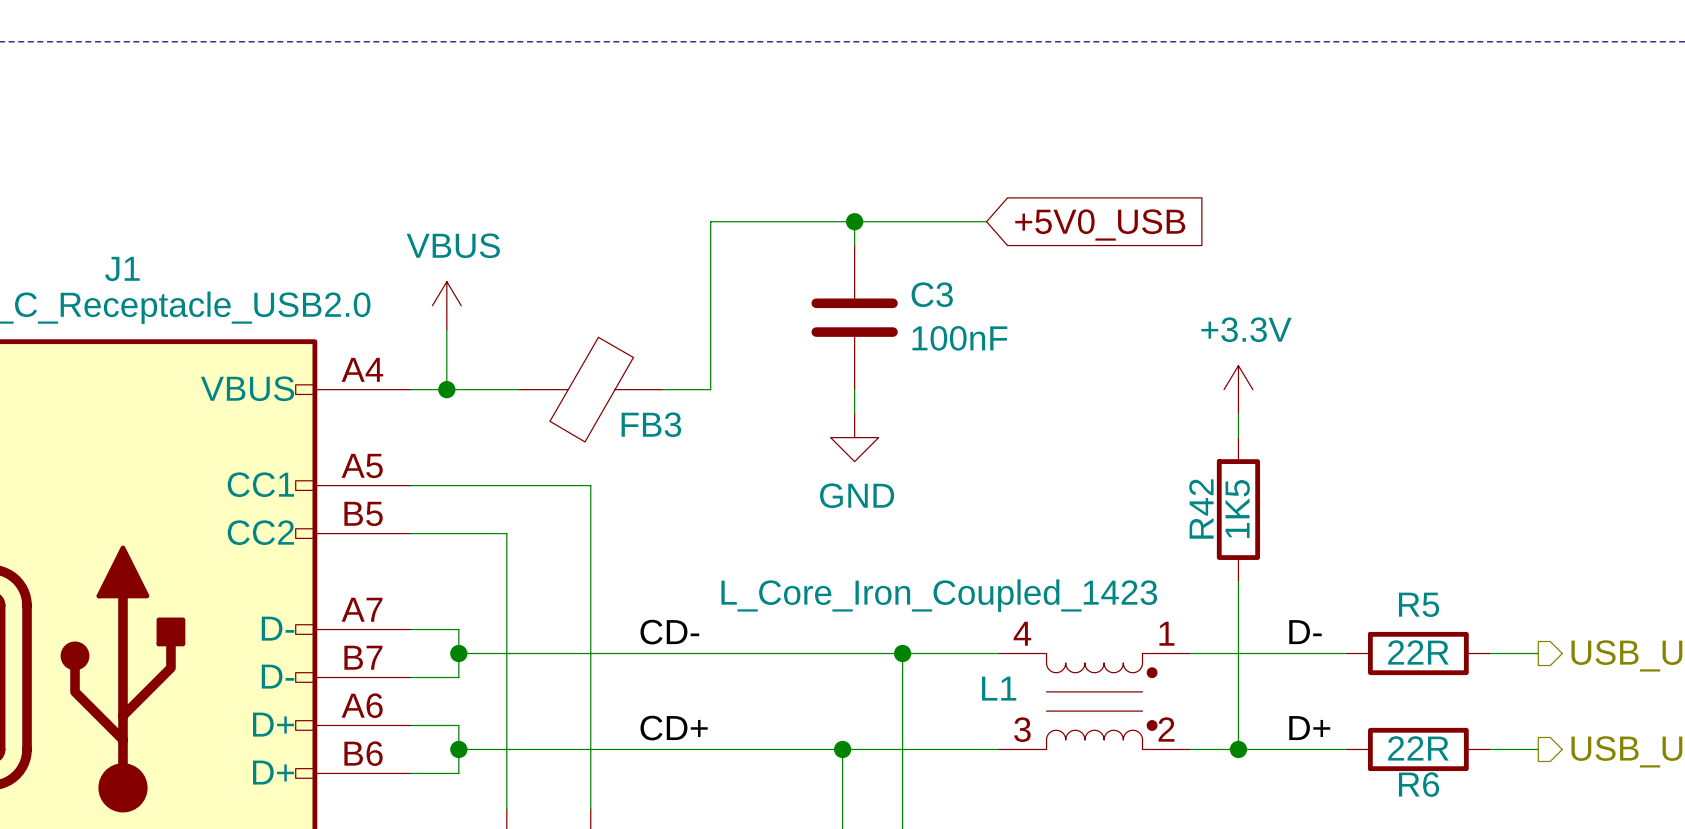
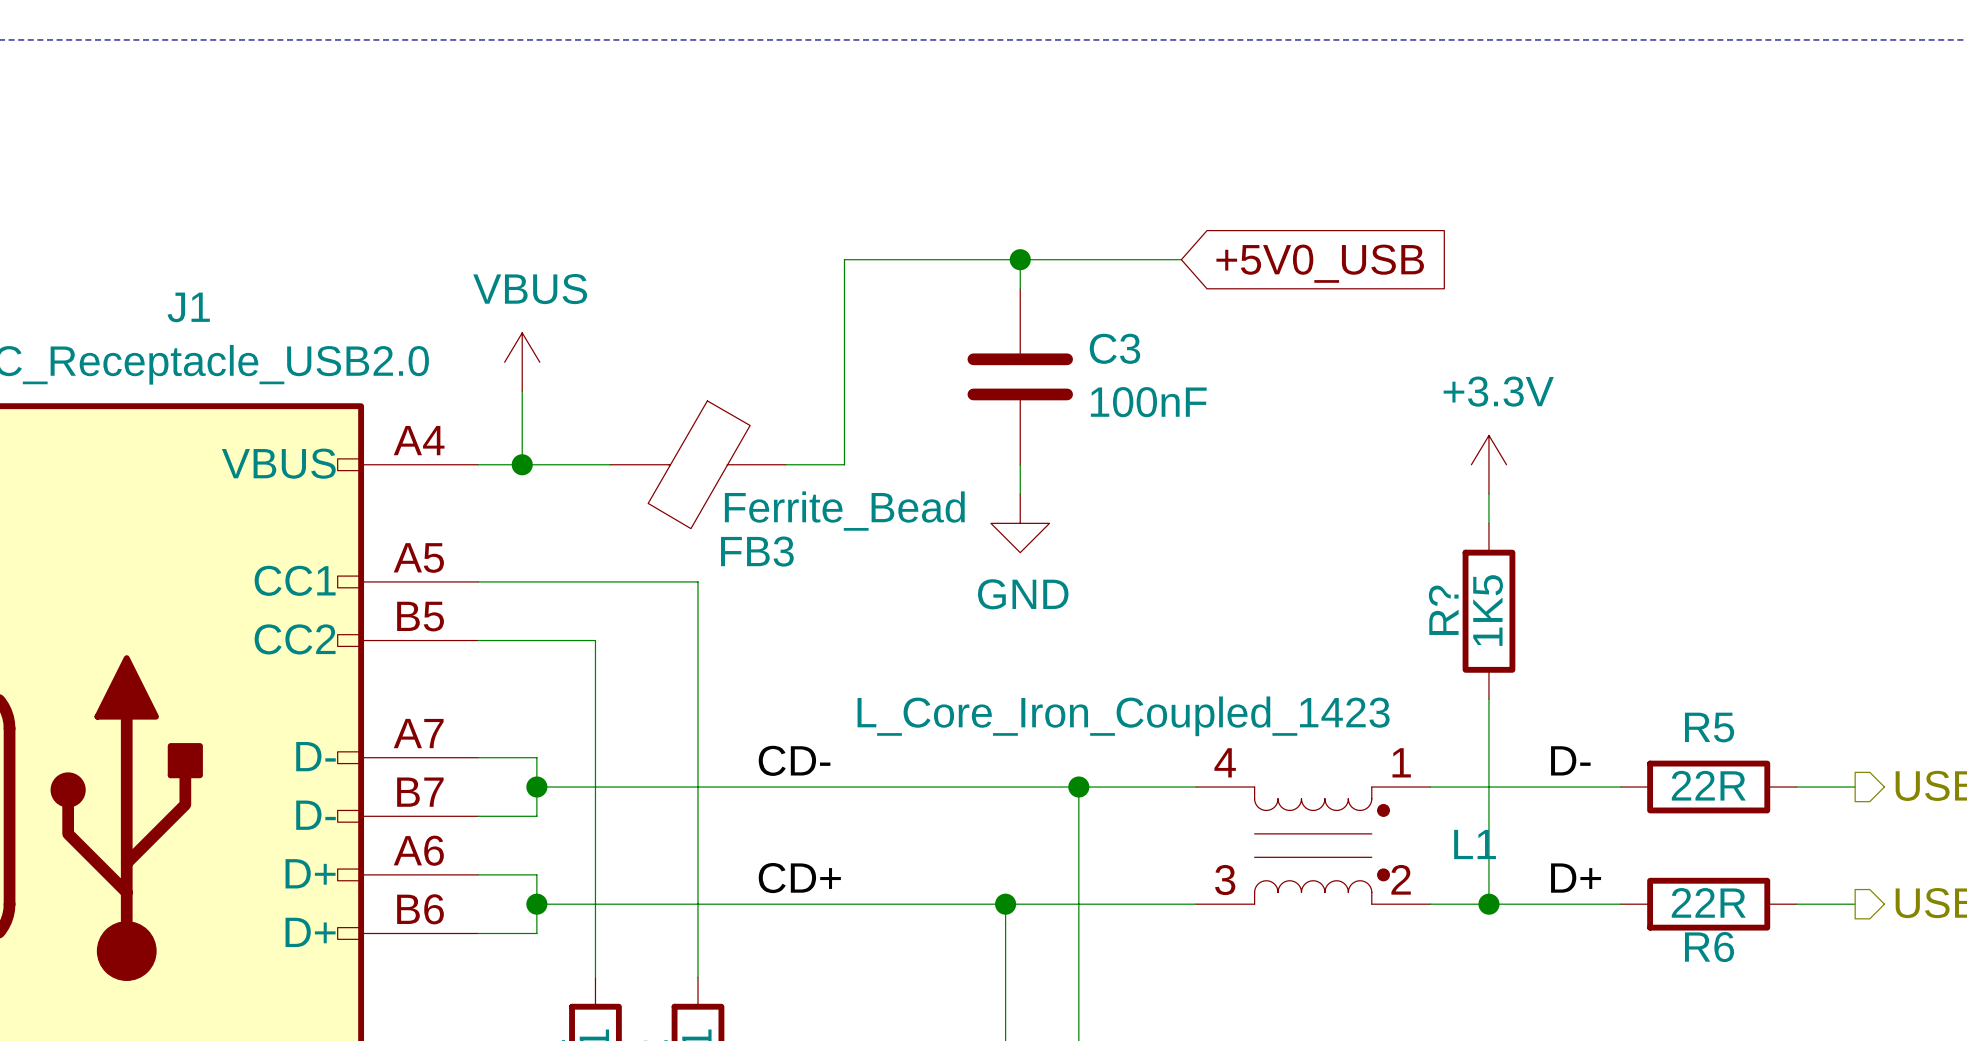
J1 name position: J1 (122, 268) -> J1 (188, 307)
FB3 name position: FB3 (651, 424) -> FB3 (757, 551)
FB3 value: none -> Ferrite_Bead (844, 511)
R42 name: R42 (1201, 509) -> R? (1443, 610)
L1 name position: L1 (999, 688) -> L1 (1475, 844)

